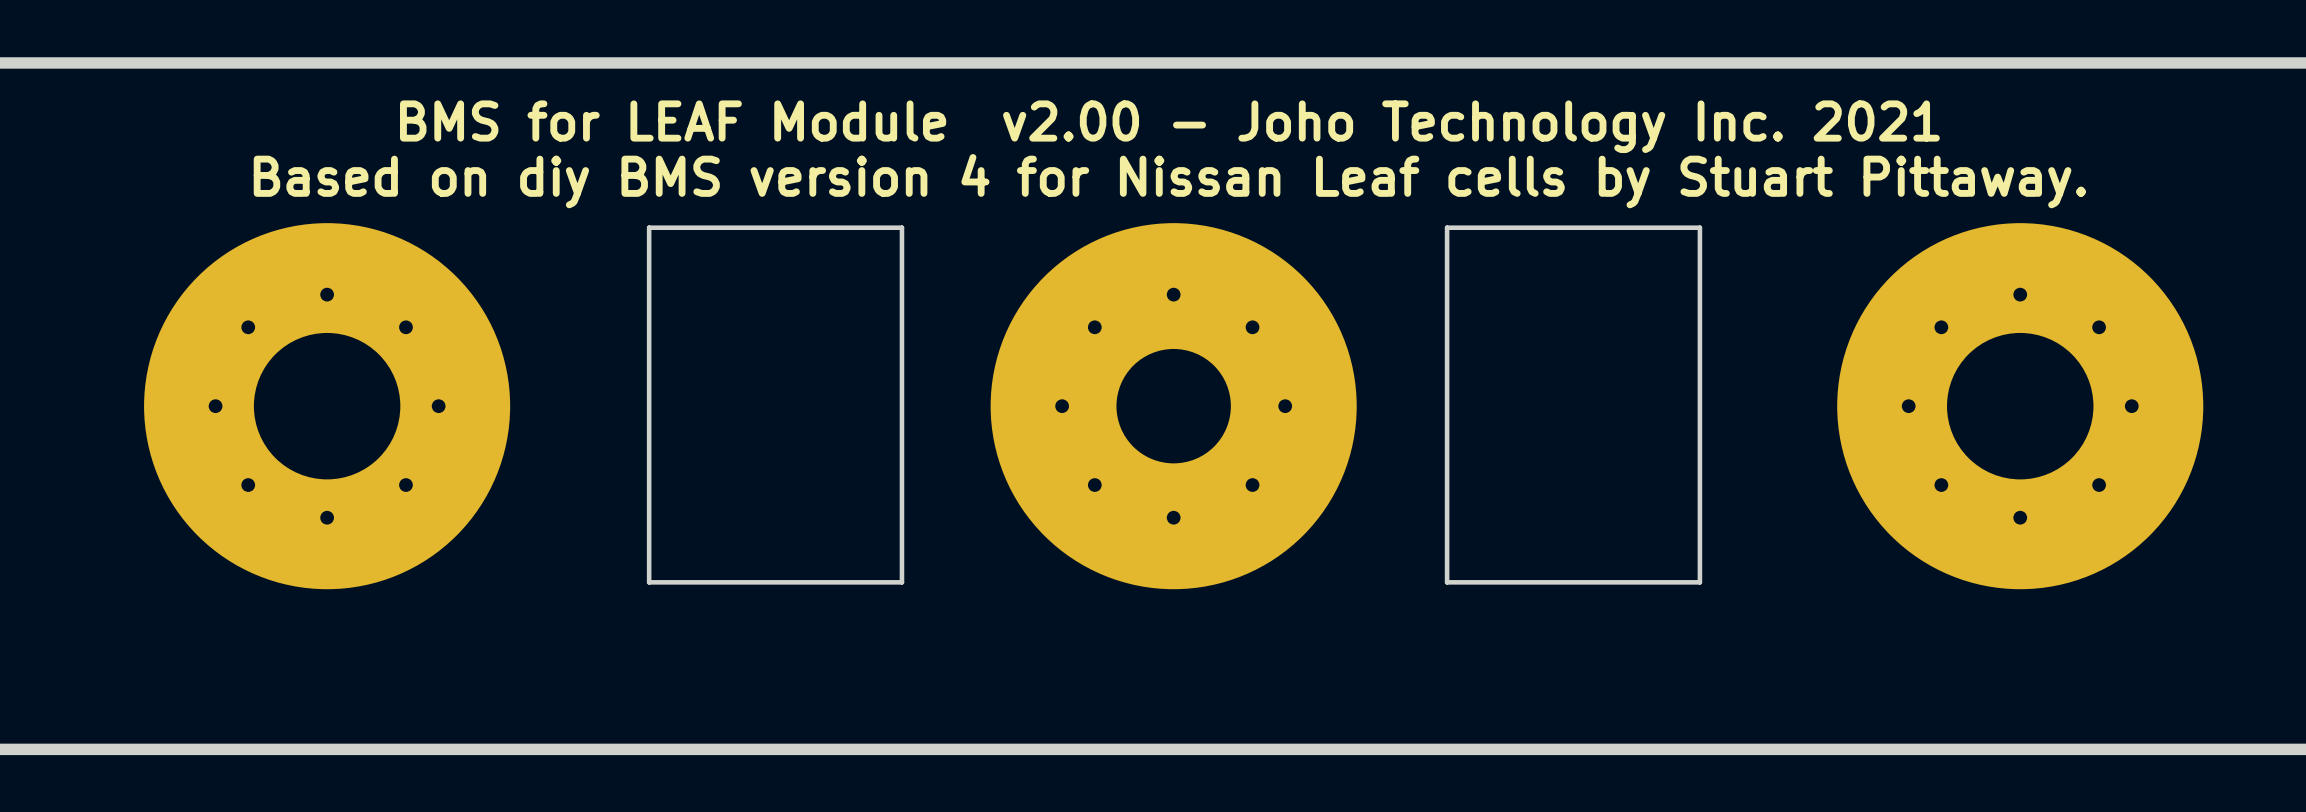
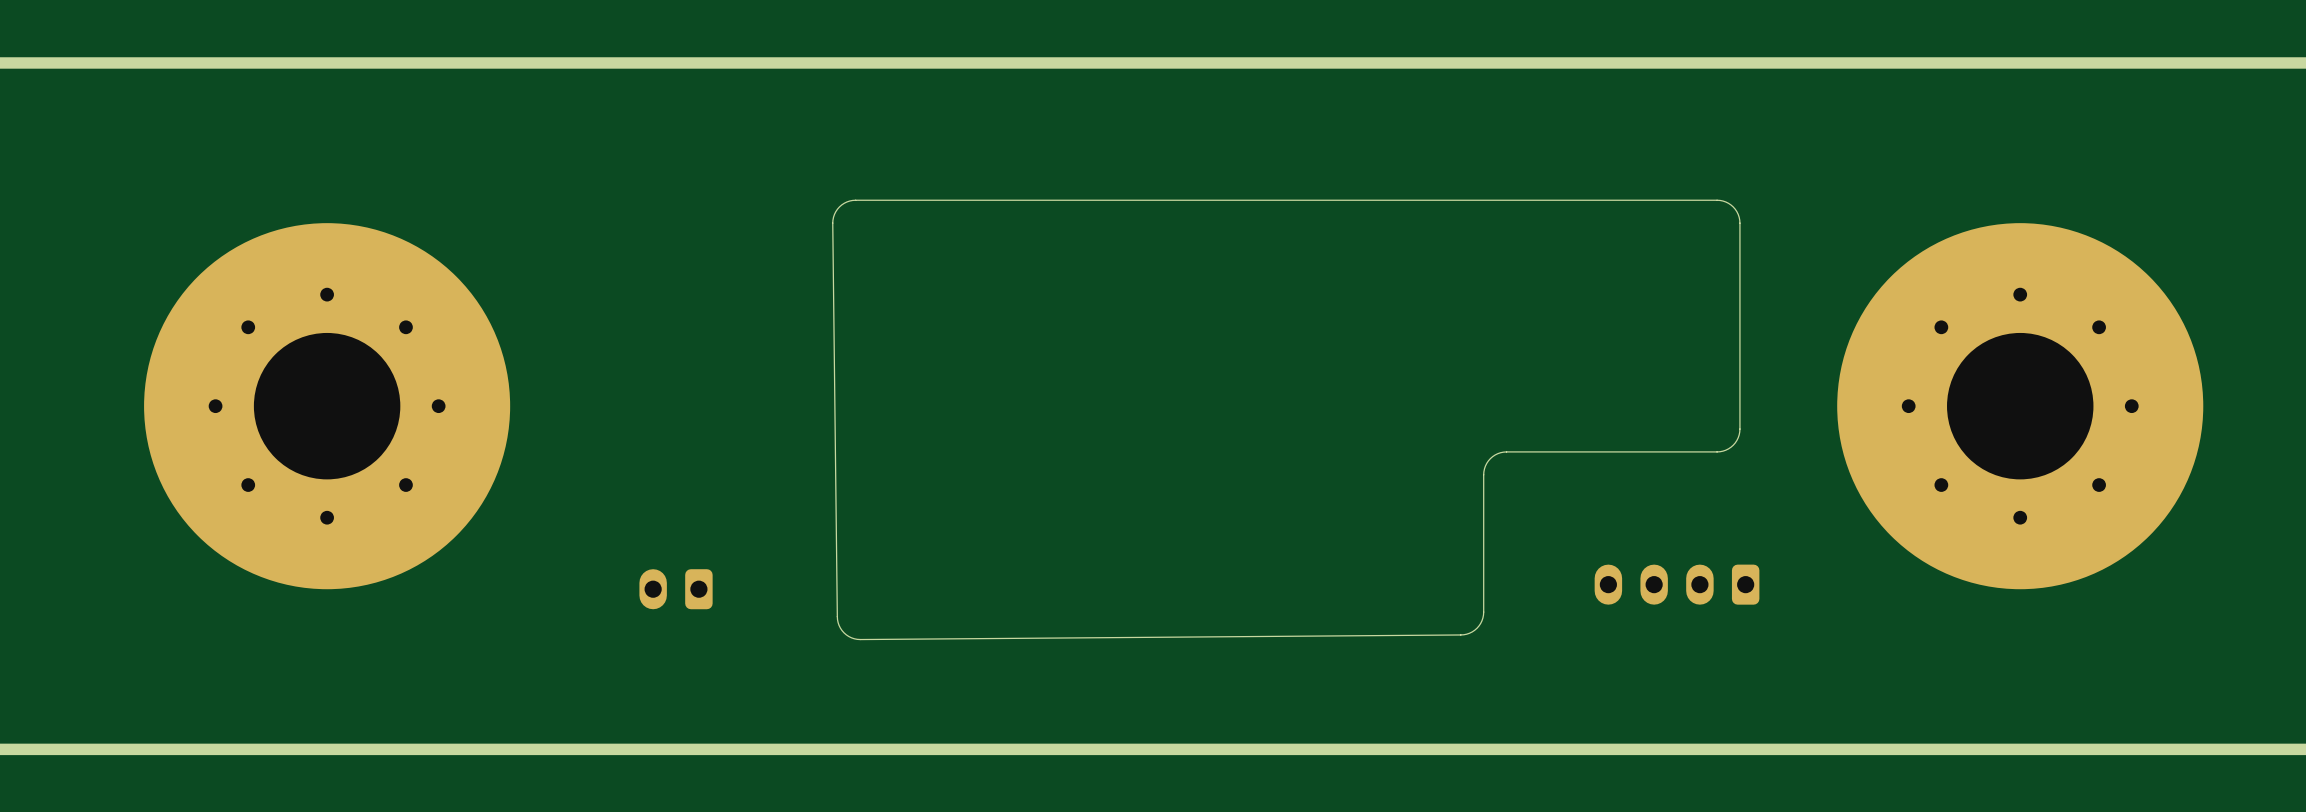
text: BMS for LEAF Module v2.00 - Joho Technology Inc. 2021 (1169, 126) -> none
text: Based on diy BMS version 4 for Nissan Leaf cells by Stuart Pittaway. (1169, 181) -> none
board edge: none -> (1717, 200) (855, 200) (846, 201) (837, 209) (832, 223) (837, 616) (839, 625) (846, 634) (860, 639) (1460, 634) (1469, 633) (1478, 626) (1483, 615) (1483, 474) (1486, 463) (1492, 456) (1506, 451) (1720, 451) (1730, 447) (1736, 440) (1739, 429) (1739, 220) (1733, 206) (1725, 201) (1717, 200)
board edge: (901, 227) (649, 227) (649, 582) (901, 582) (901, 227) -> none
board edge: (1699, 227) (1447, 227) (1447, 582) (1699, 582) (1699, 227) -> none
part: (1173, 406) -> none
part: none -> (1677, 584)
part: none -> (676, 589)

